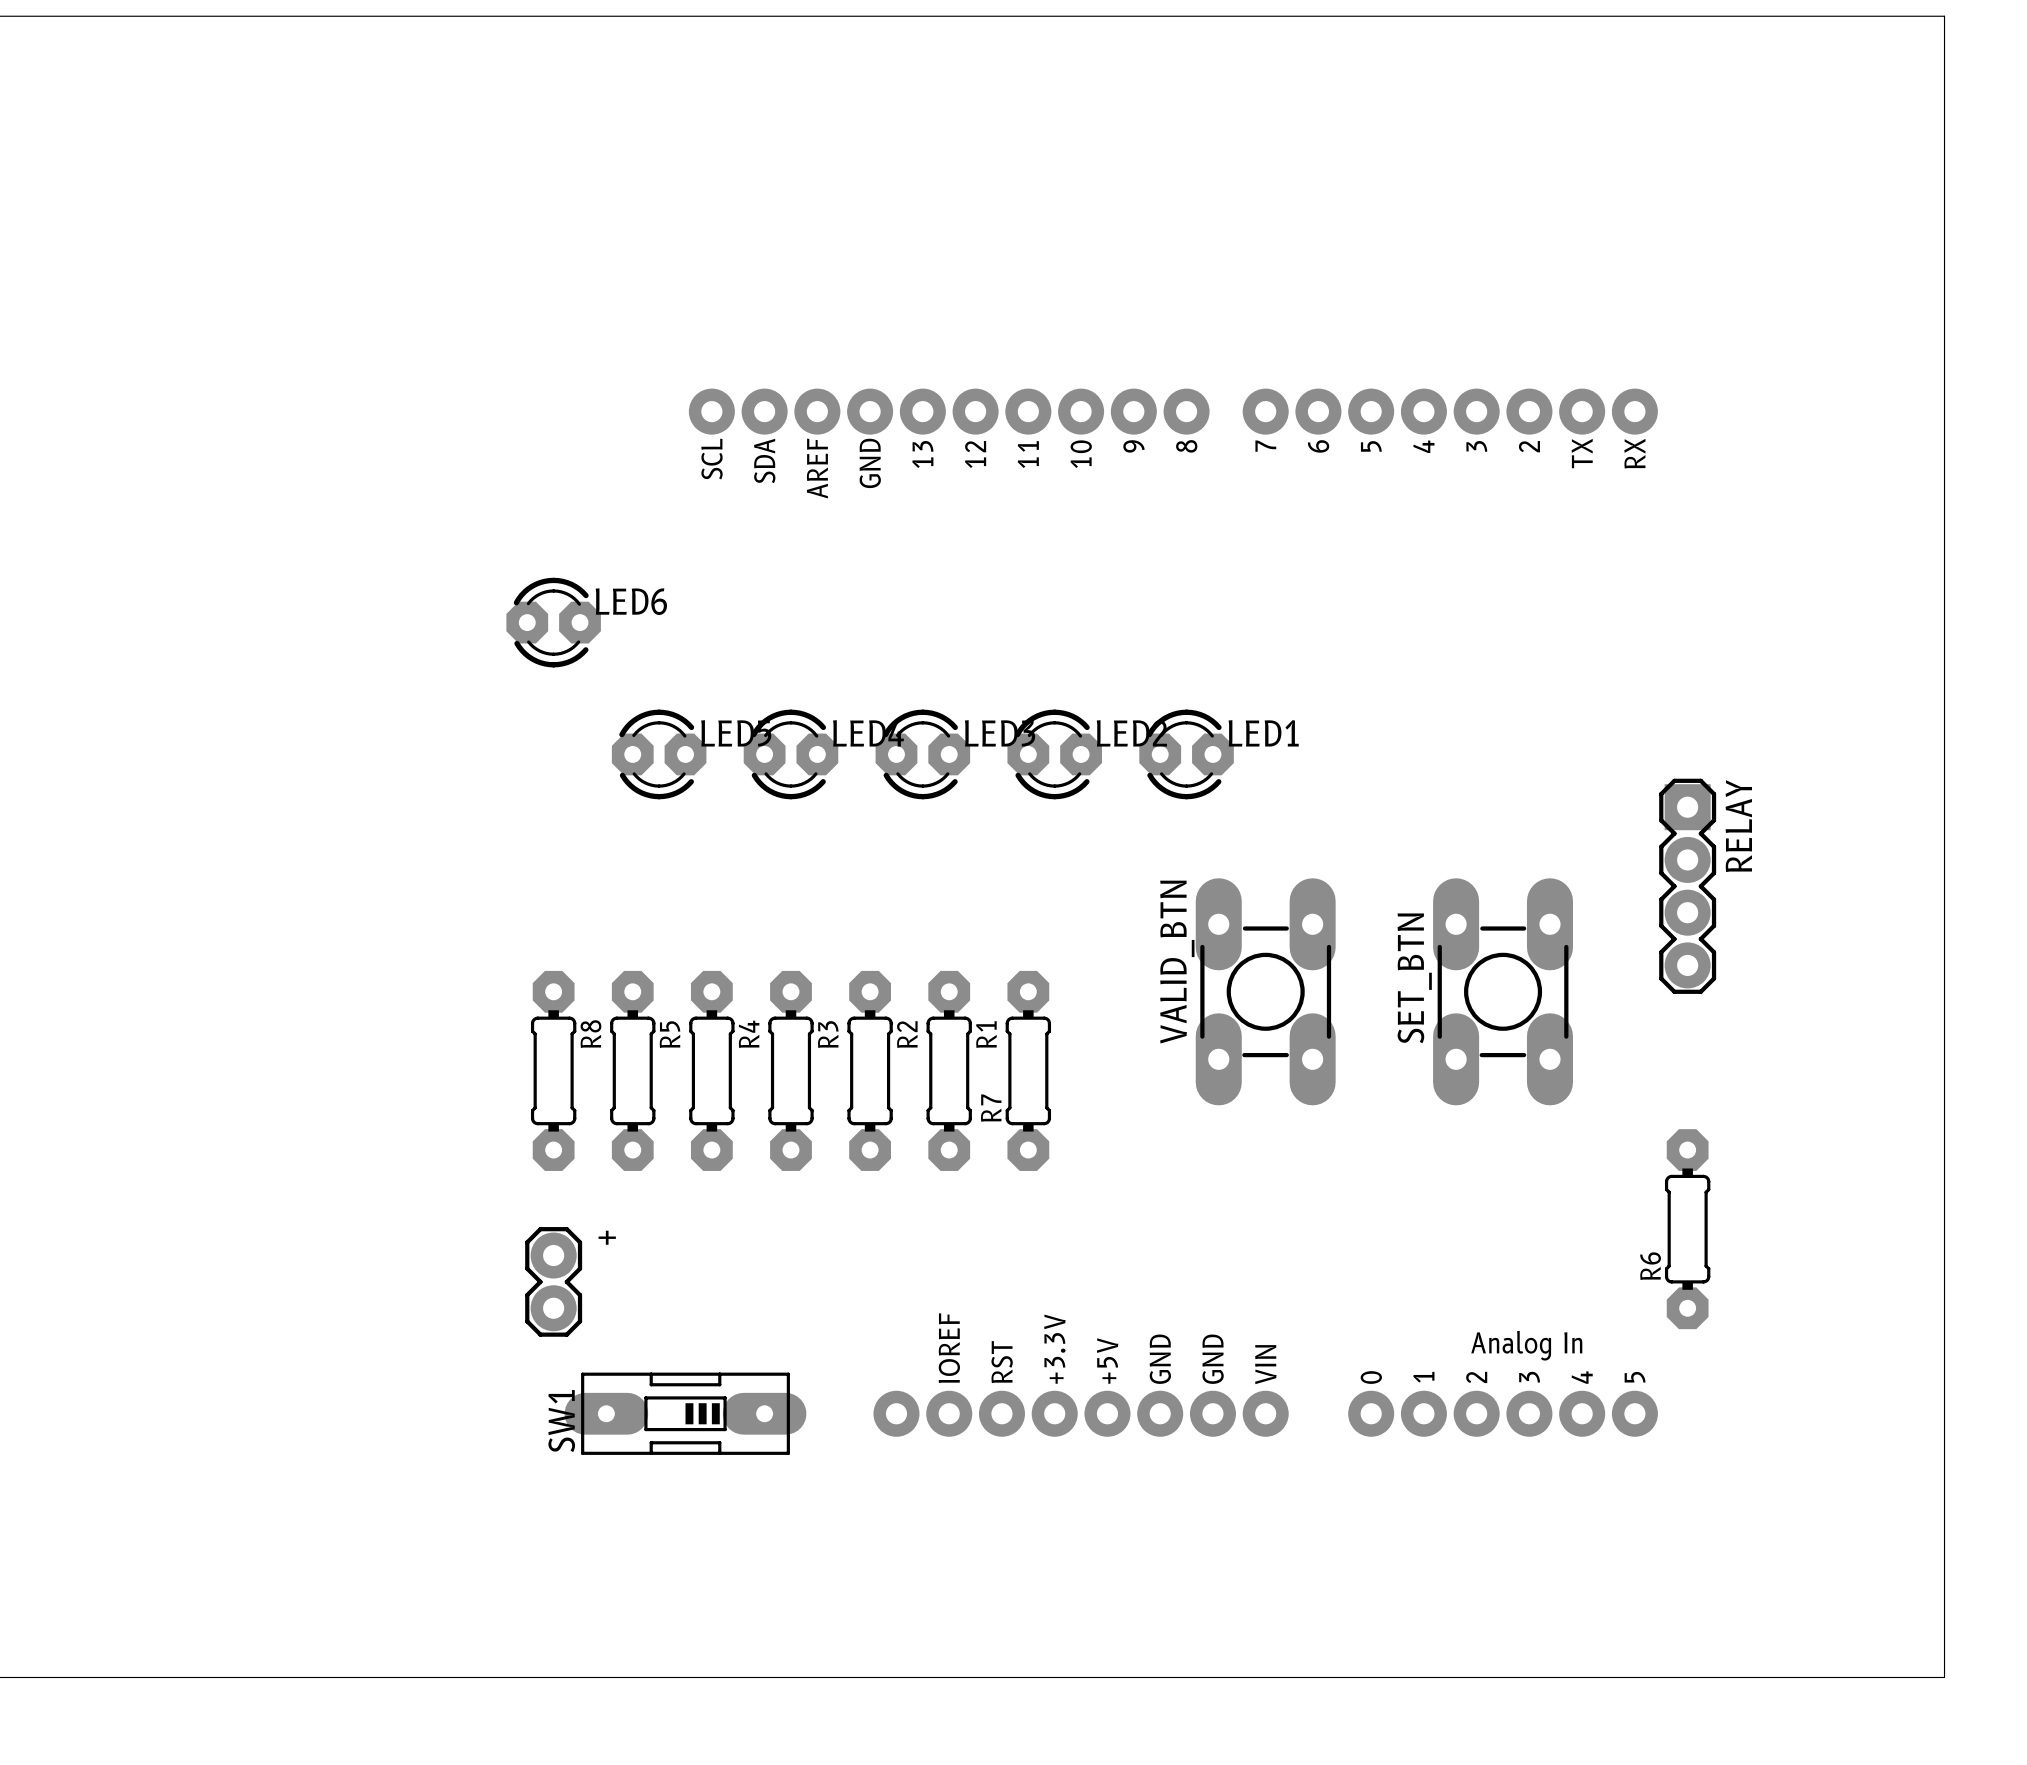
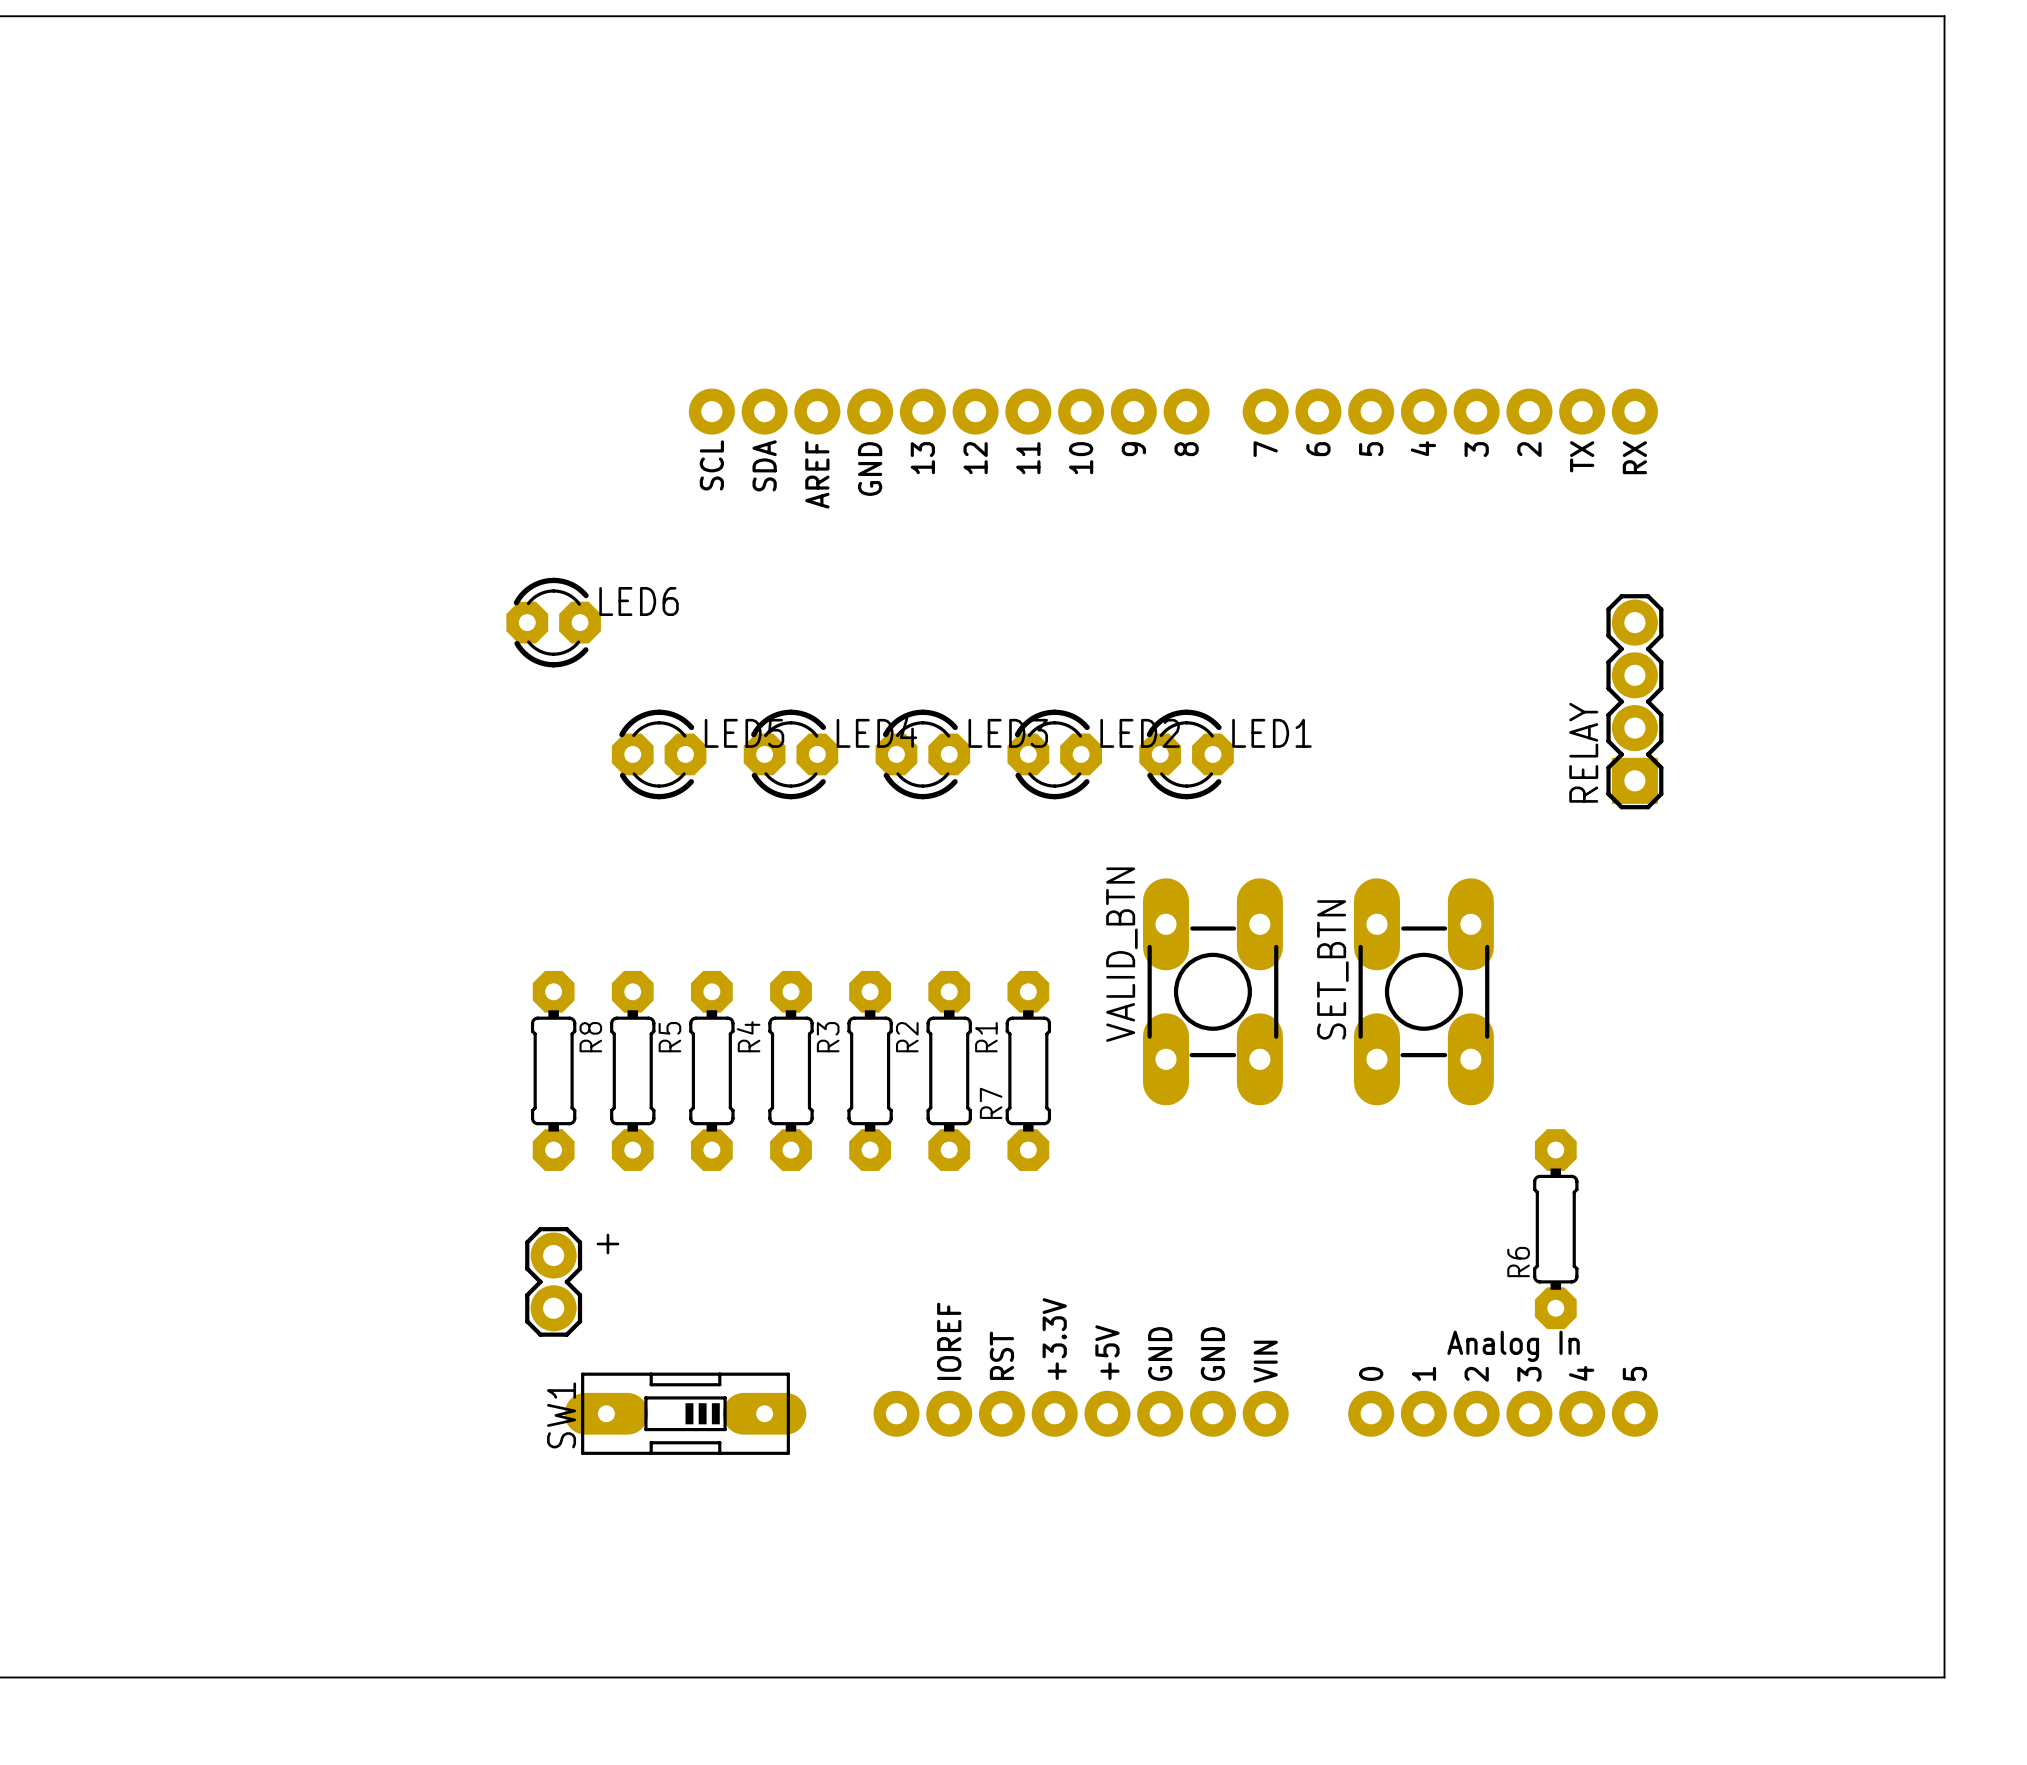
RELAY rotation: 0° (1687, 886) -> 180° (1634, 701)
RELAY position: (1687, 886) -> (1634, 701)
VALID_BTN position: (1265, 991) -> (1212, 991)
SET_BTN position: (1503, 991) -> (1423, 991)
R6 position: (1687, 1229) -> (1555, 1229)

